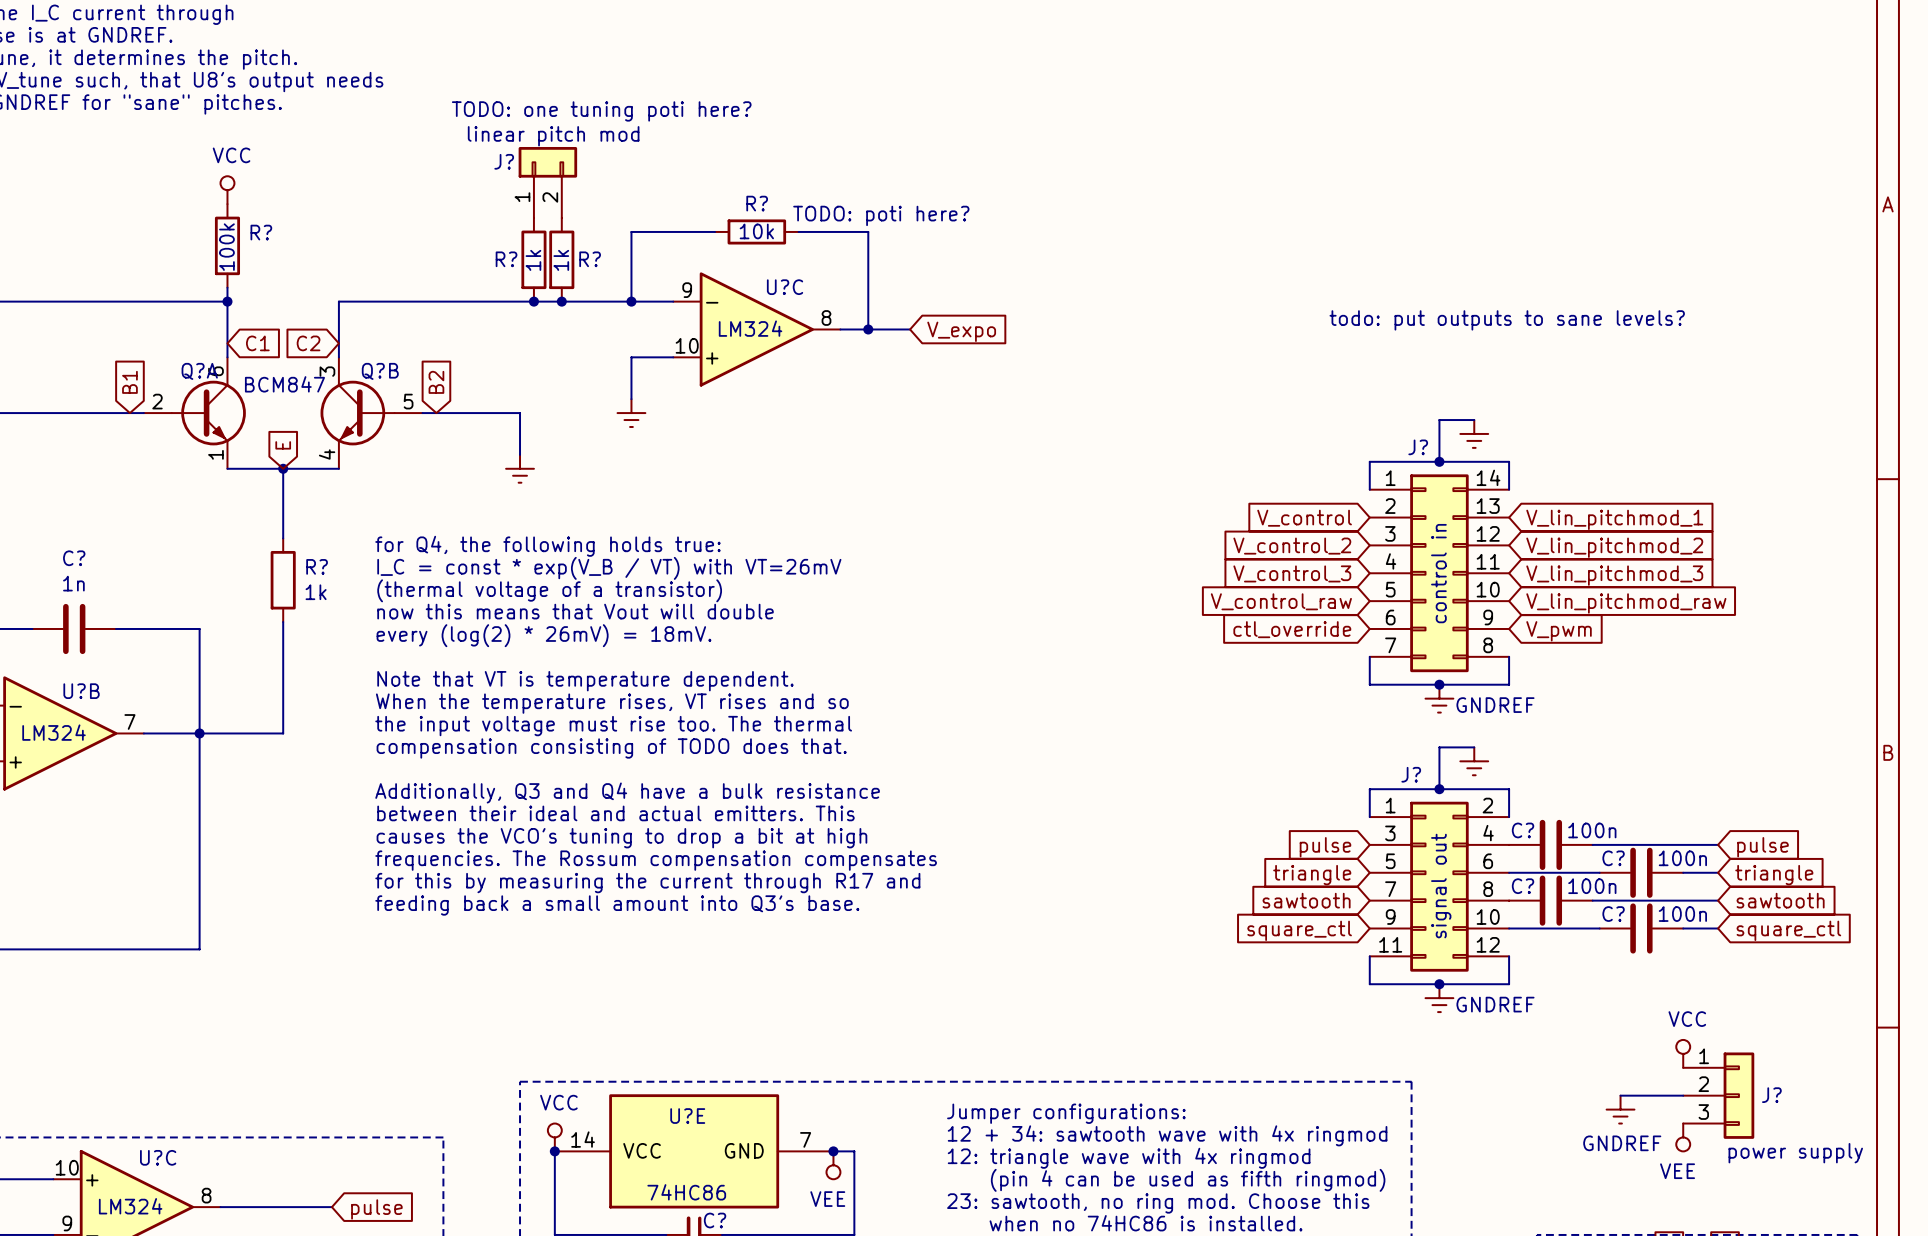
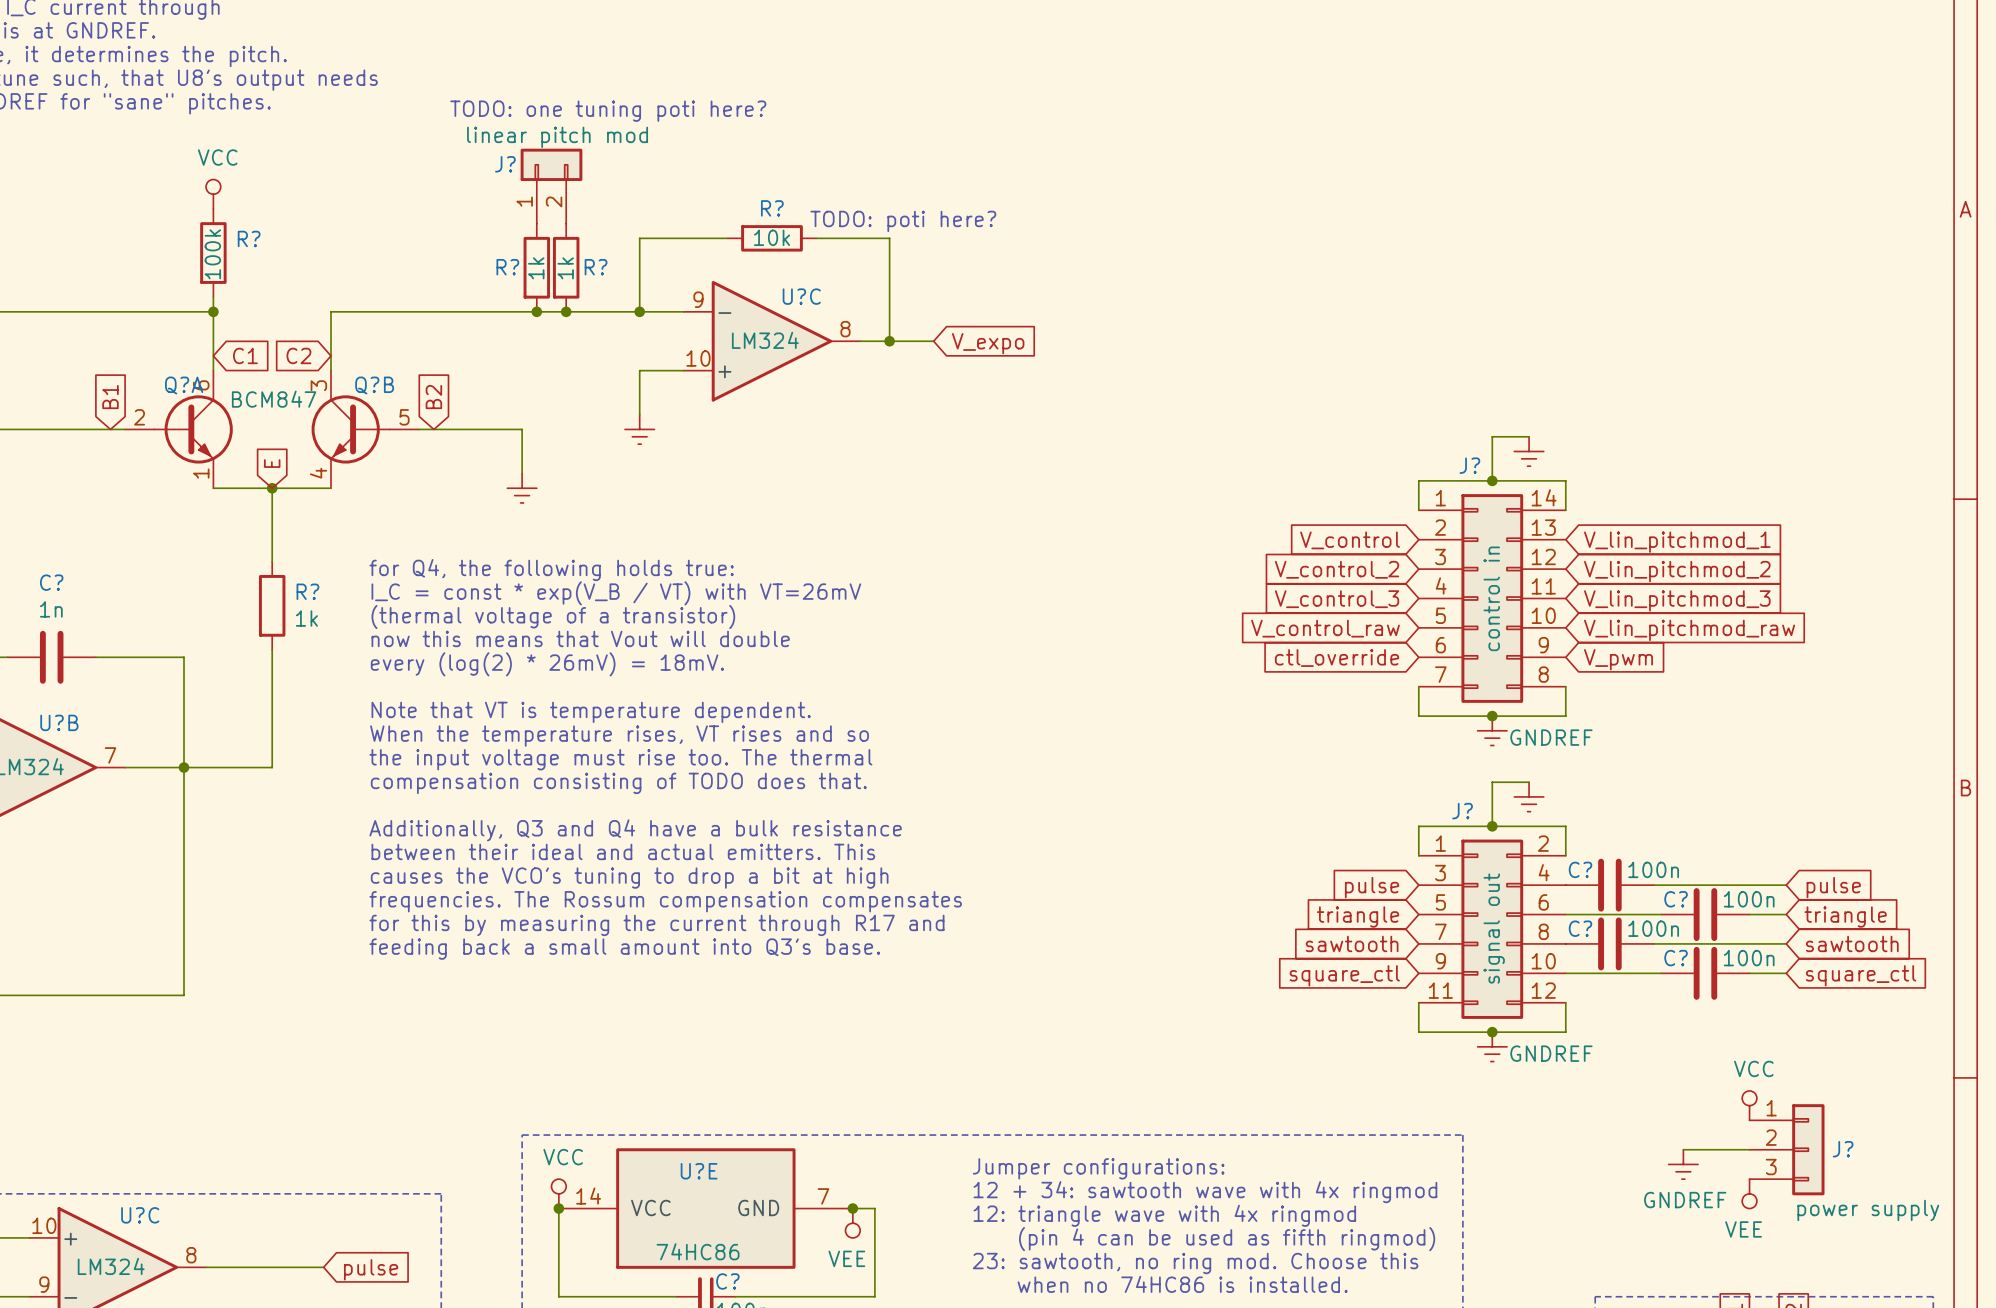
text: todo: put outputs to sane levels? (1507, 320) -> none

